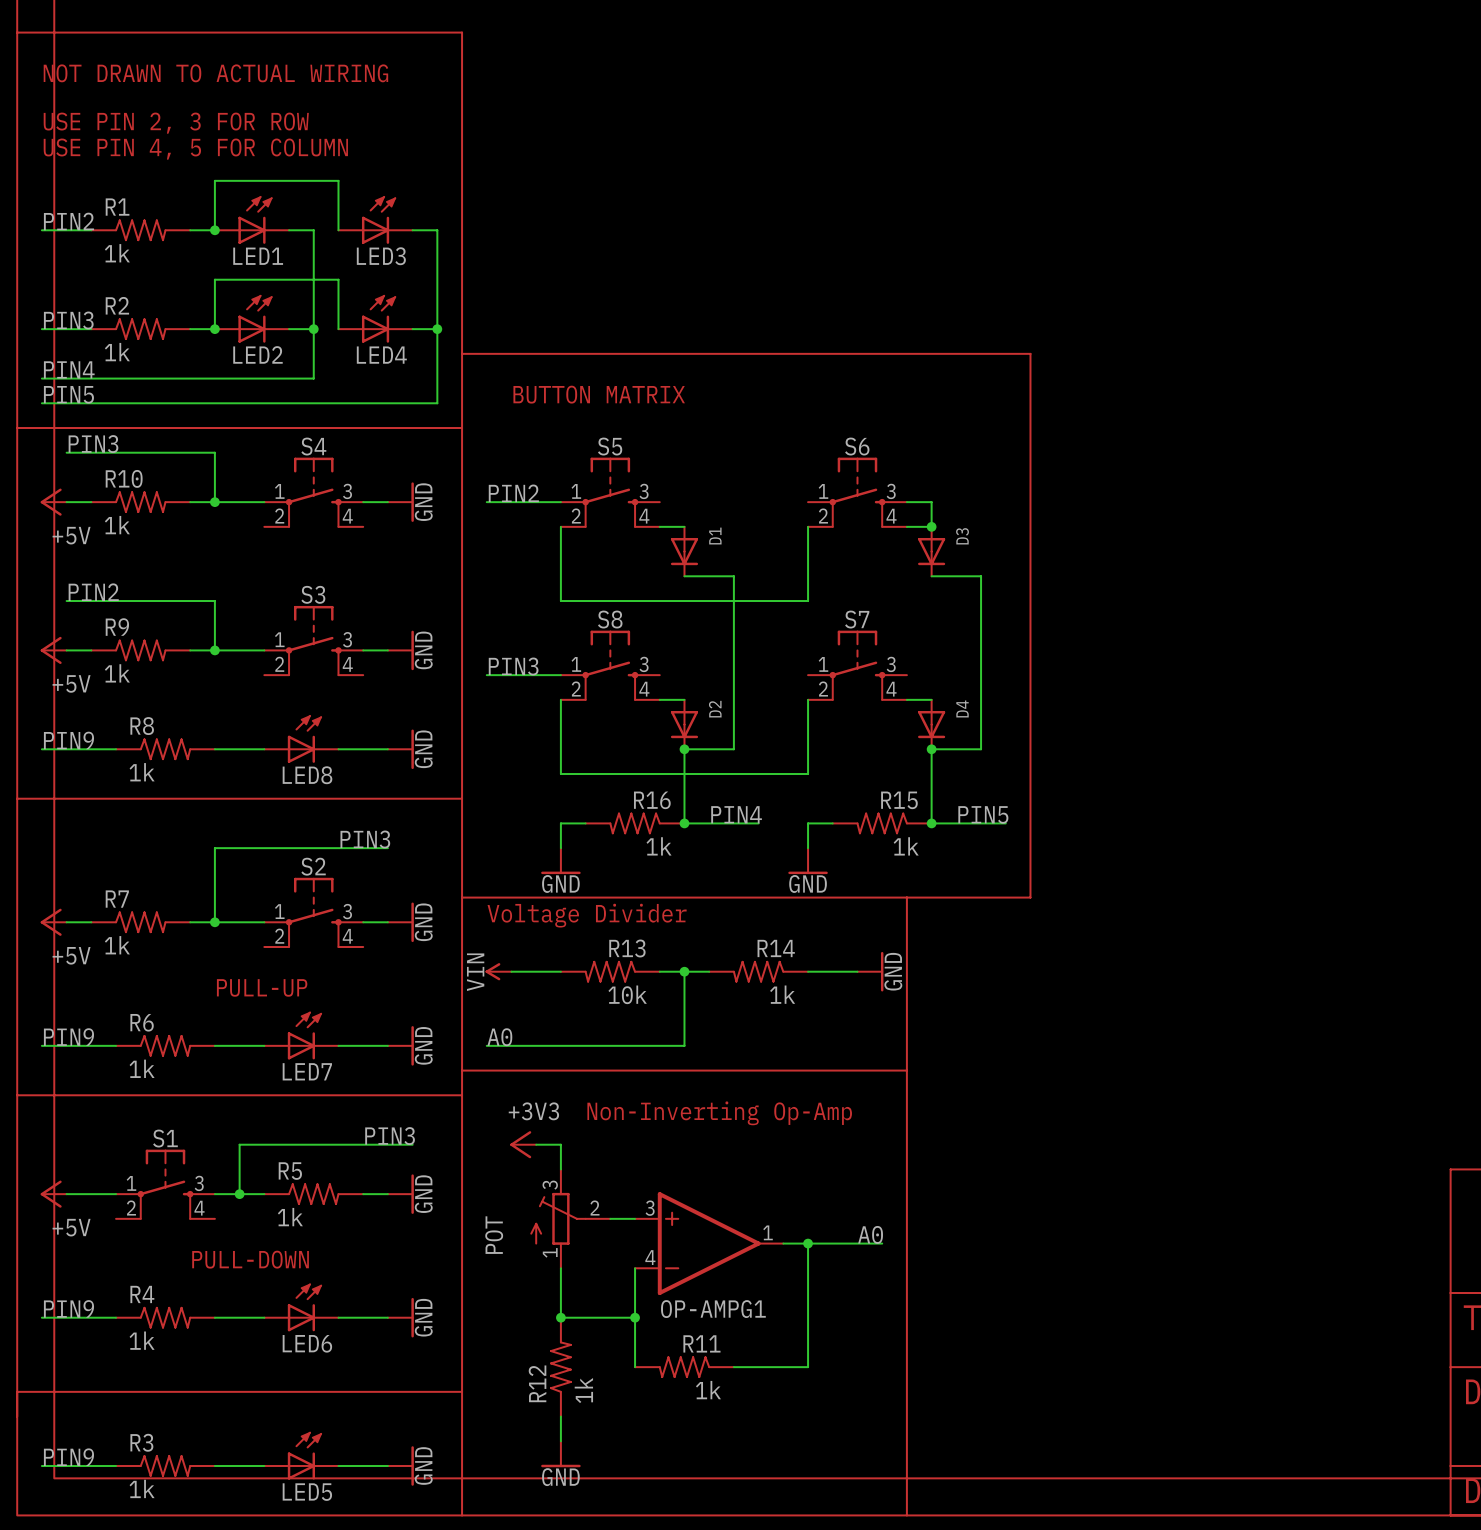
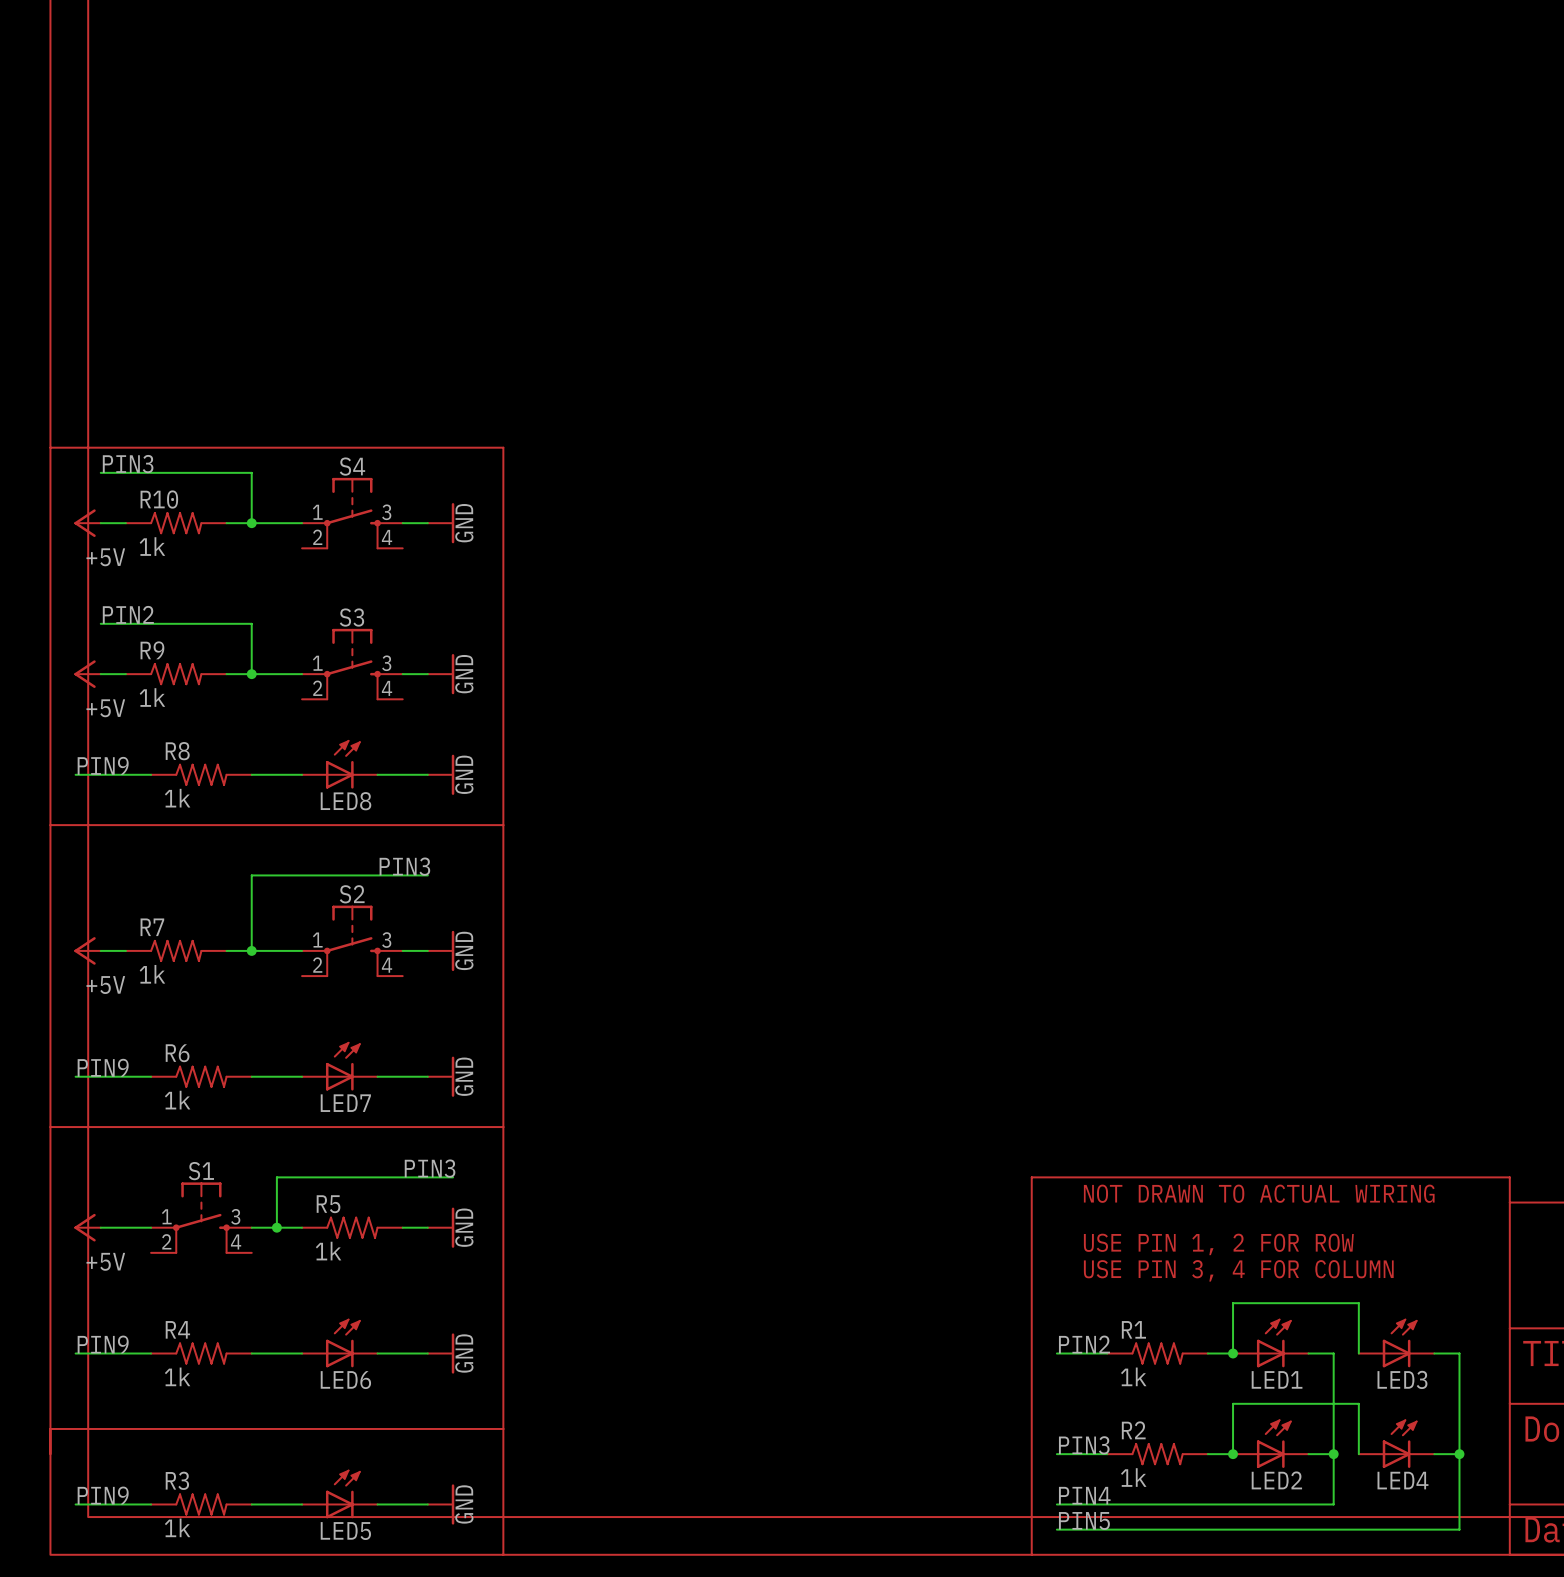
line: (17, 32) (462, 32) (462, 428) -> none
text: NOT DRAWN TO ACTUAL WIRING (215, 73) -> none
text: USE PIN 2, 3 FOR ROW (176, 123) -> none
text: USE PIN 4, 5 FOR COLUMN (195, 149) -> none
LED1 position: (251, 220) -> (1270, 1343)
LED3 position: (375, 220) -> (1396, 1343)
label: PIN2 (68, 221) -> none
wire: (41, 230) (91, 230) -> none
R1 position: (140, 230) -> (1157, 1353)
wire: (190, 230) (214, 230) (214, 180) (338, 180) (338, 230) -> none
junction: (214, 230) -> none
wire: (289, 230) (313, 230) (313, 378) (41, 378) -> none
wire: (412, 230) (437, 230) (437, 403) (41, 403) -> none
LED2 position: (251, 318) -> (1270, 1443)
LED4 position: (375, 318) -> (1396, 1443)
label: PIN3 (68, 320) -> none
wire: (41, 329) (91, 329) -> none
R2 position: (140, 329) -> (1157, 1454)
wire: (190, 329) (214, 329) (214, 279) (338, 279) (338, 329) -> none
junction: (214, 329) -> none
wire: (289, 329) (313, 329) -> none
junction: (313, 329) -> none
wire: (412, 329) (437, 329) -> none
junction: (437, 329) -> none
line: (462, 353) (1030, 353) (1030, 897) (462, 897) -> none
label: PIN4 (69, 369) -> none
label: PIN5 (68, 394) -> none
text: BUTTON MATRIX (599, 394) -> none
S5: (610, 492) -> none
S6: (857, 492) -> none
label: PIN2 (513, 493) -> none
wire: (486, 502) (560, 502) -> none
wire: (906, 502) (931, 502) (931, 526) (906, 526) -> none
wire: (560, 526) (560, 601) (808, 601) (808, 526) -> none
wire: (659, 526) (684, 526) -> none
junction: (931, 526) -> none
D1: (684, 551) -> none
D3: (931, 551) -> none
wire: (684, 576) (733, 576) (733, 749) (684, 749) (684, 823) (758, 823) -> none
wire: (931, 576) (981, 576) (981, 749) (931, 749) (931, 823) (1005, 823) -> none
S8: (610, 665) -> none
S7: (857, 665) -> none
label: PIN3 (513, 666) -> none
wire: (486, 675) (560, 675) -> none
wire: (560, 699) (560, 774) (808, 774) (808, 699) -> none
wire: (659, 699) (684, 699) -> none
wire: (906, 699) (931, 699) -> none
D2: (684, 724) -> none
D4: (931, 724) -> none
junction: (684, 749) -> none
junction: (931, 749) -> none
label: PIN4 (736, 814) -> none
label: PIN5 (983, 814) -> none
wire: (585, 823) (560, 823) (560, 848) -> none
R16: 1k (635, 823) -> none
junction: (684, 823) -> none
wire: (832, 823) (808, 823) (808, 848) -> none
R15: 1k (882, 823) -> none
junction: (931, 823) -> none
power symbol: GND (560, 861) -> none
power symbol: GND (808, 861) -> none
line: (906, 897) (906, 1515) -> none
text: Voltage Divider (587, 915) -> none
power symbol: VIN (498, 971) -> none
wire: (511, 971) (560, 971) -> none
R13: 10k (610, 971) -> none
wire: (659, 971) (709, 971) -> none
wire: (684, 971) (684, 1045) (486, 1045) -> none
junction: (684, 971) -> none
R14: 1k (758, 971) -> none
wire: (808, 971) (857, 971) -> none
power symbol: GND (870, 971) -> none
text: PULL-UP (262, 987) -> none
label: A0 (499, 1037) -> none
line: (462, 1070) (906, 1070) -> none
text: Non-Inverting Op-Amp (719, 1113) -> none
power symbol: +3V3 (523, 1144) -> none
wire: (536, 1144) (560, 1144) (560, 1169) -> none
text: none -> NOT DRAWN TO ACTUAL WIRING (1259, 1193)
line: none -> (1509, 1202) (1509, 1177) (1031, 1177) (1031, 1554)
text: none -> USE PIN 1, 2 FOR ROW (1218, 1244)
POT: (570, 1218) -> none
wire: (610, 1218) (635, 1218) -> none
label: A0 (870, 1234) -> none
text: none -> USE PIN 3, 4 FOR COLUMN (1238, 1270)
OP-AMPG1: (709, 1243) -> none
wire: (783, 1243) (882, 1243) -> none
wire: (808, 1243) (808, 1367) (733, 1367) -> none
junction: (808, 1243) -> none
text: PULL-DOWN (250, 1259) -> none
wire: (560, 1268) (560, 1317) (635, 1317) -> none
wire: (635, 1268) (635, 1367) -> none
label: none -> PIN2 (1084, 1344)
junction: (560, 1317) -> none
junction: (635, 1317) -> none
wire: none -> (1056, 1353) (1107, 1353)
wire: none -> (1207, 1353) (1233, 1353) (1233, 1303) (1358, 1303) (1358, 1353)
junction: none -> (1233, 1353)
wire: none -> (1308, 1353) (1333, 1353) (1333, 1504) (1056, 1504)
wire: none -> (1434, 1353) (1459, 1353) (1459, 1529) (1056, 1529)
R12: 1k (560, 1367) -> none
R11: 1k (684, 1367) -> none
label: none -> PIN3 (1084, 1445)
wire: (560, 1416) (560, 1441) -> none
wire: none -> (1056, 1454) (1107, 1454)
wire: none -> (1207, 1454) (1233, 1454) (1233, 1403) (1358, 1403) (1358, 1454)
junction: none -> (1233, 1454)
wire: none -> (1308, 1454) (1333, 1454)
junction: none -> (1333, 1454)
wire: none -> (1434, 1454) (1459, 1454)
junction: none -> (1459, 1454)
power symbol: GND (560, 1454) -> none
label: none -> PIN4 (1084, 1495)
label: none -> PIN5 (1084, 1520)

